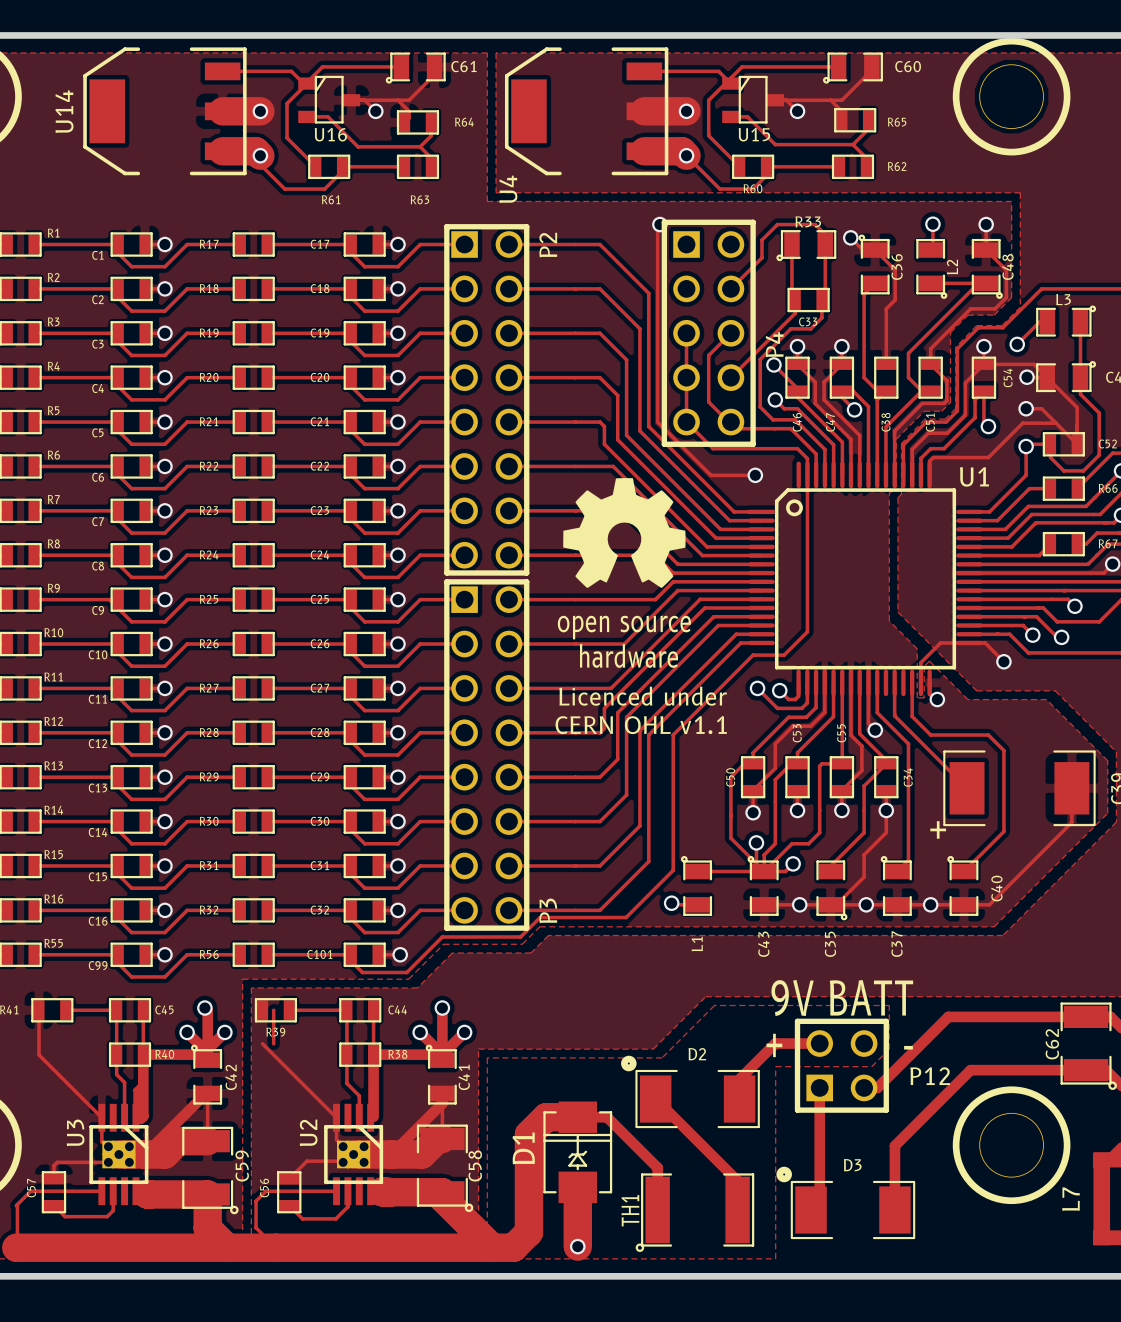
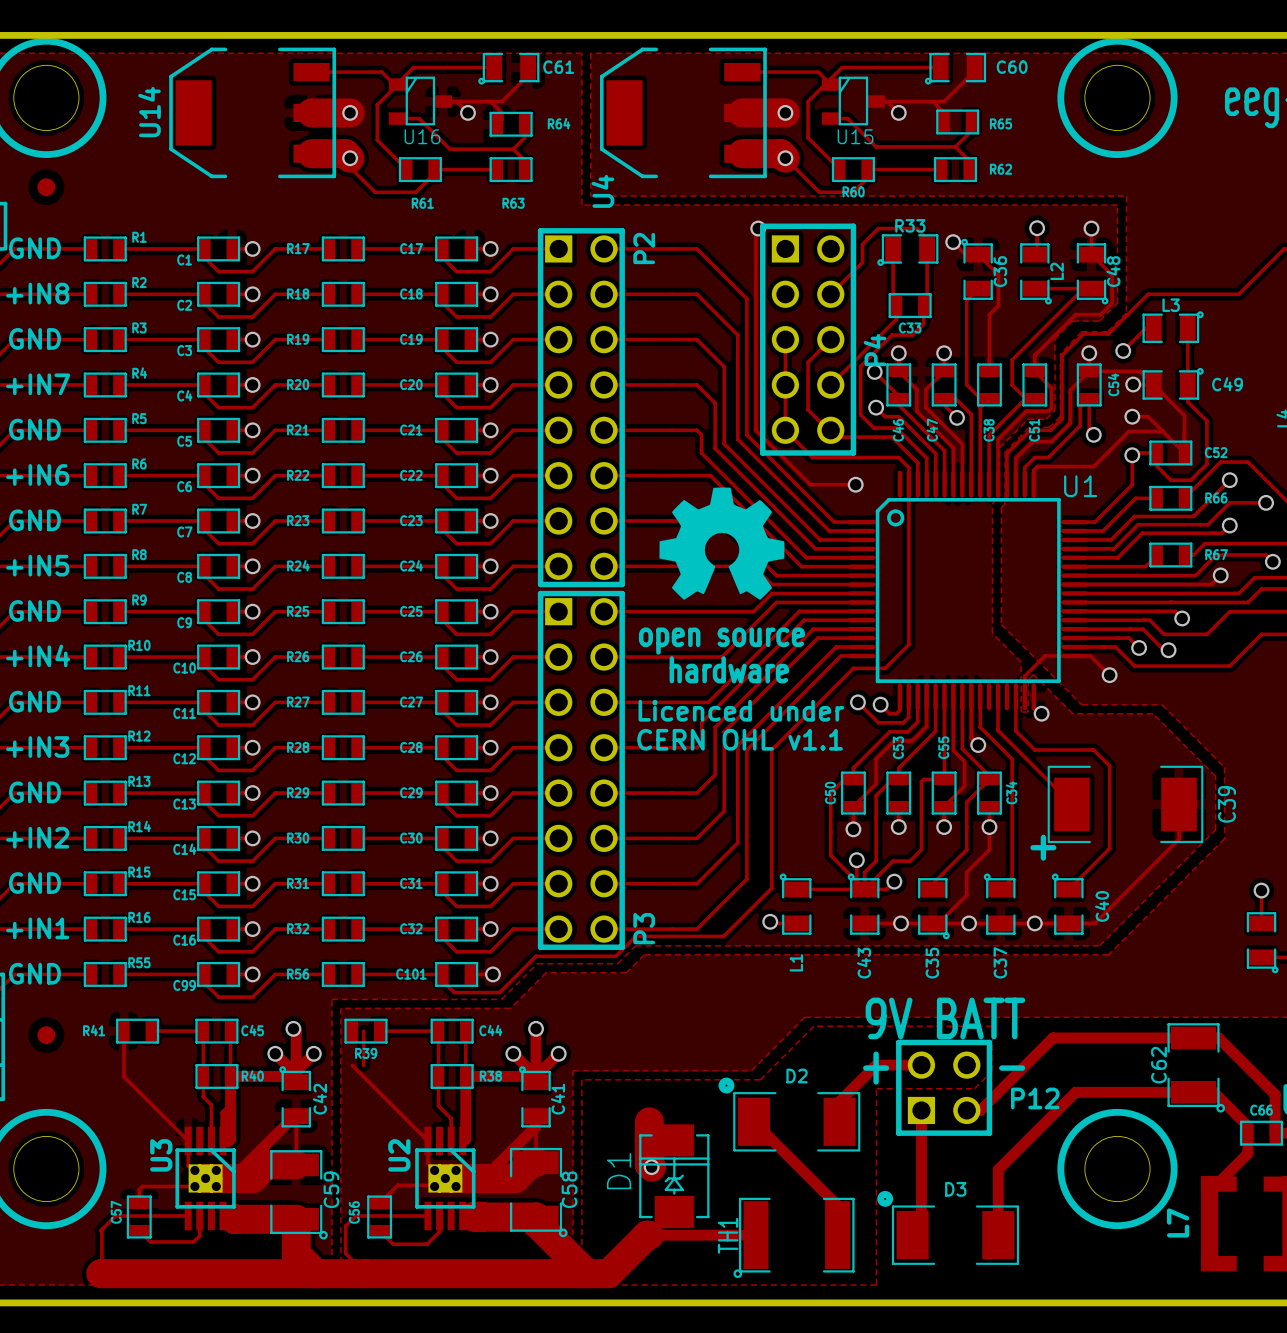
track: none -> (649, 1121) (649, 1164) (651, 1167)
via: none -> (651, 1167)
track: (577, 1187) (577, 1246) -> none
track: (657, 1210) (657, 1167) (607, 1117) (546, 1117) (528, 1134) (528, 1232) -> (755, 1235) (647, 1235) (624, 1257)
via: (577, 1246) -> none

